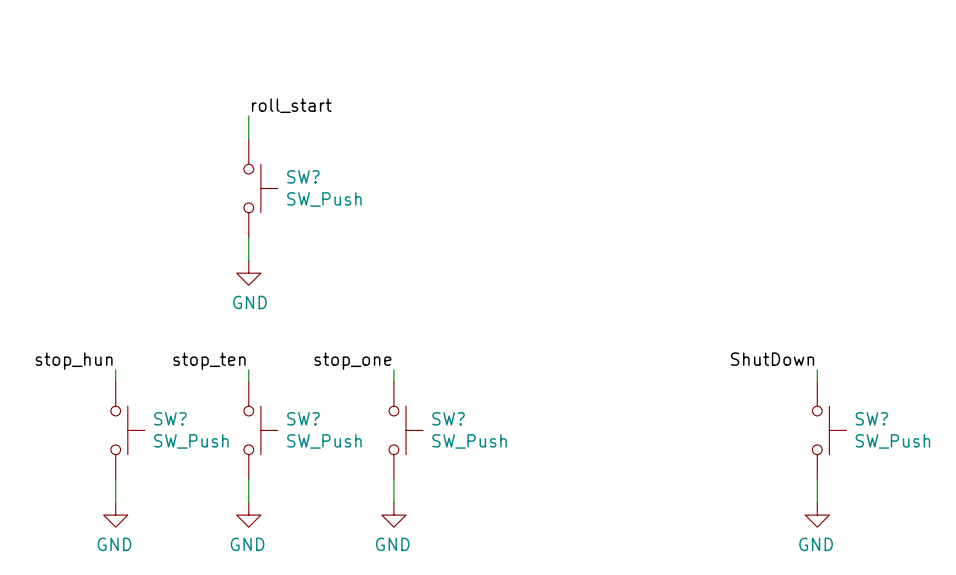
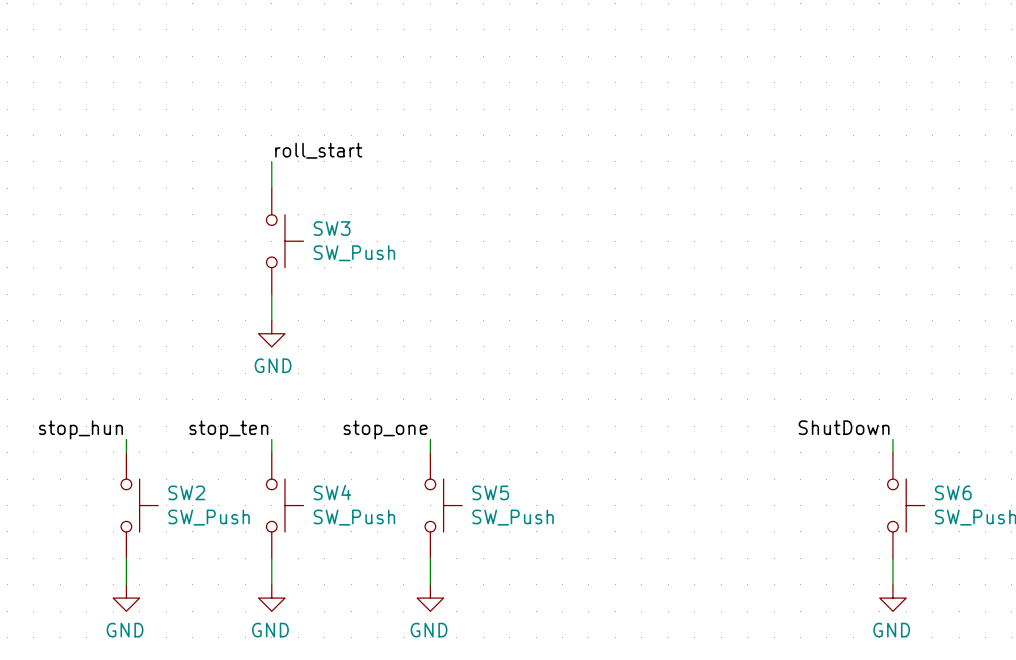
SW? name: SW? (303, 176) -> SW3 (332, 228)
SW? name: SW? (170, 418) -> SW2 (186, 492)
SW? name: SW? (303, 418) -> SW4 (332, 492)
SW? name: SW? (448, 418) -> SW5 (490, 492)
SW? name: SW? (871, 418) -> SW6 (953, 492)

